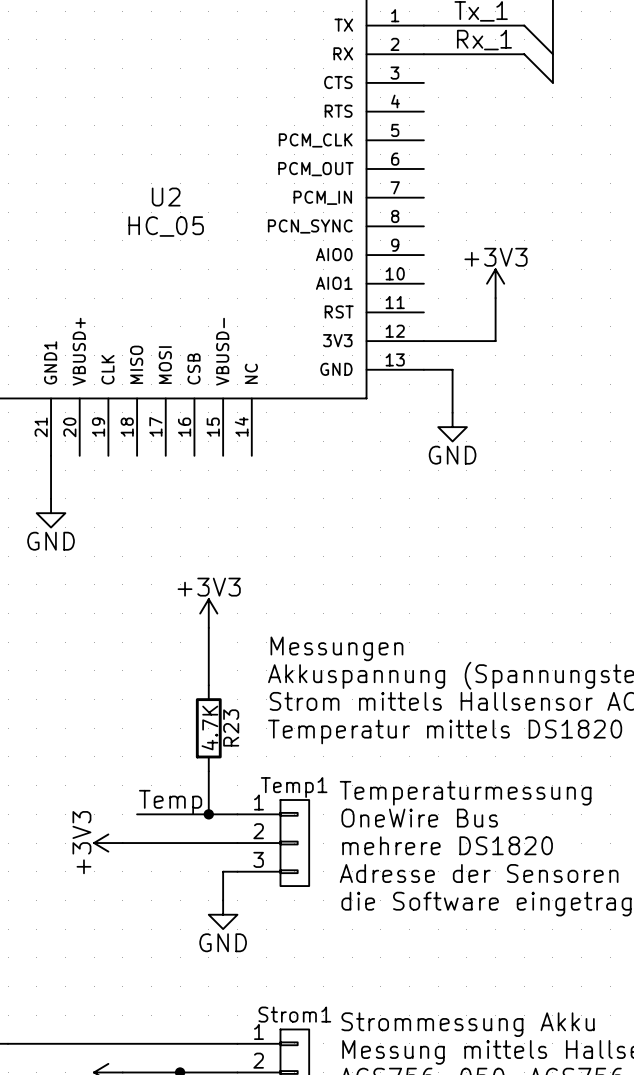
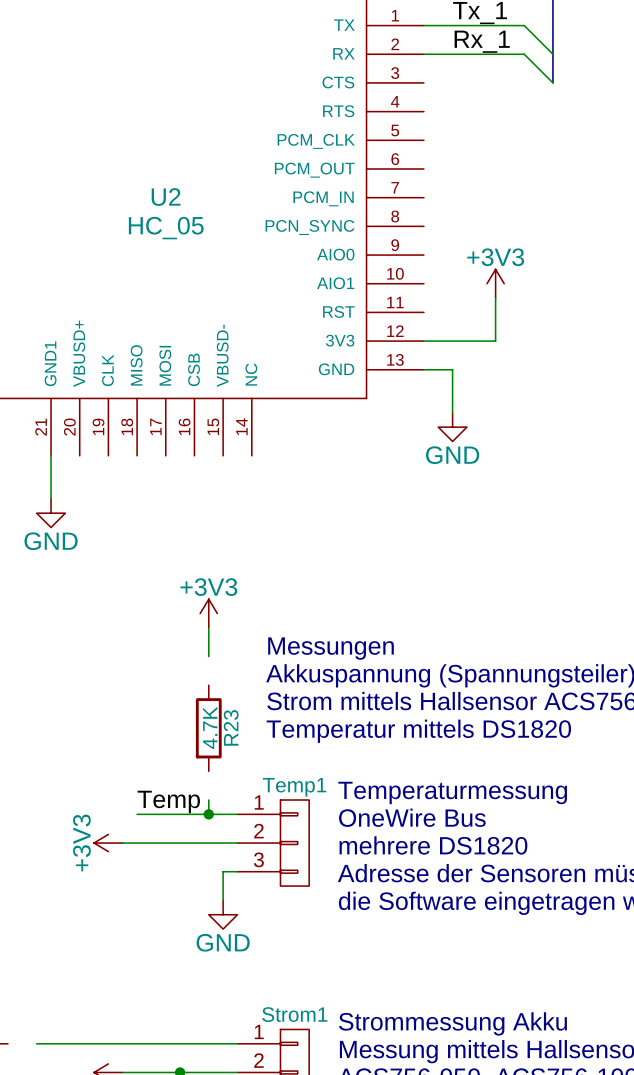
wire: (208, 656) (208, 685) -> none
wire: (208, 771) (208, 800) -> none
wire: (8, 1043) (36, 1043) -> none

